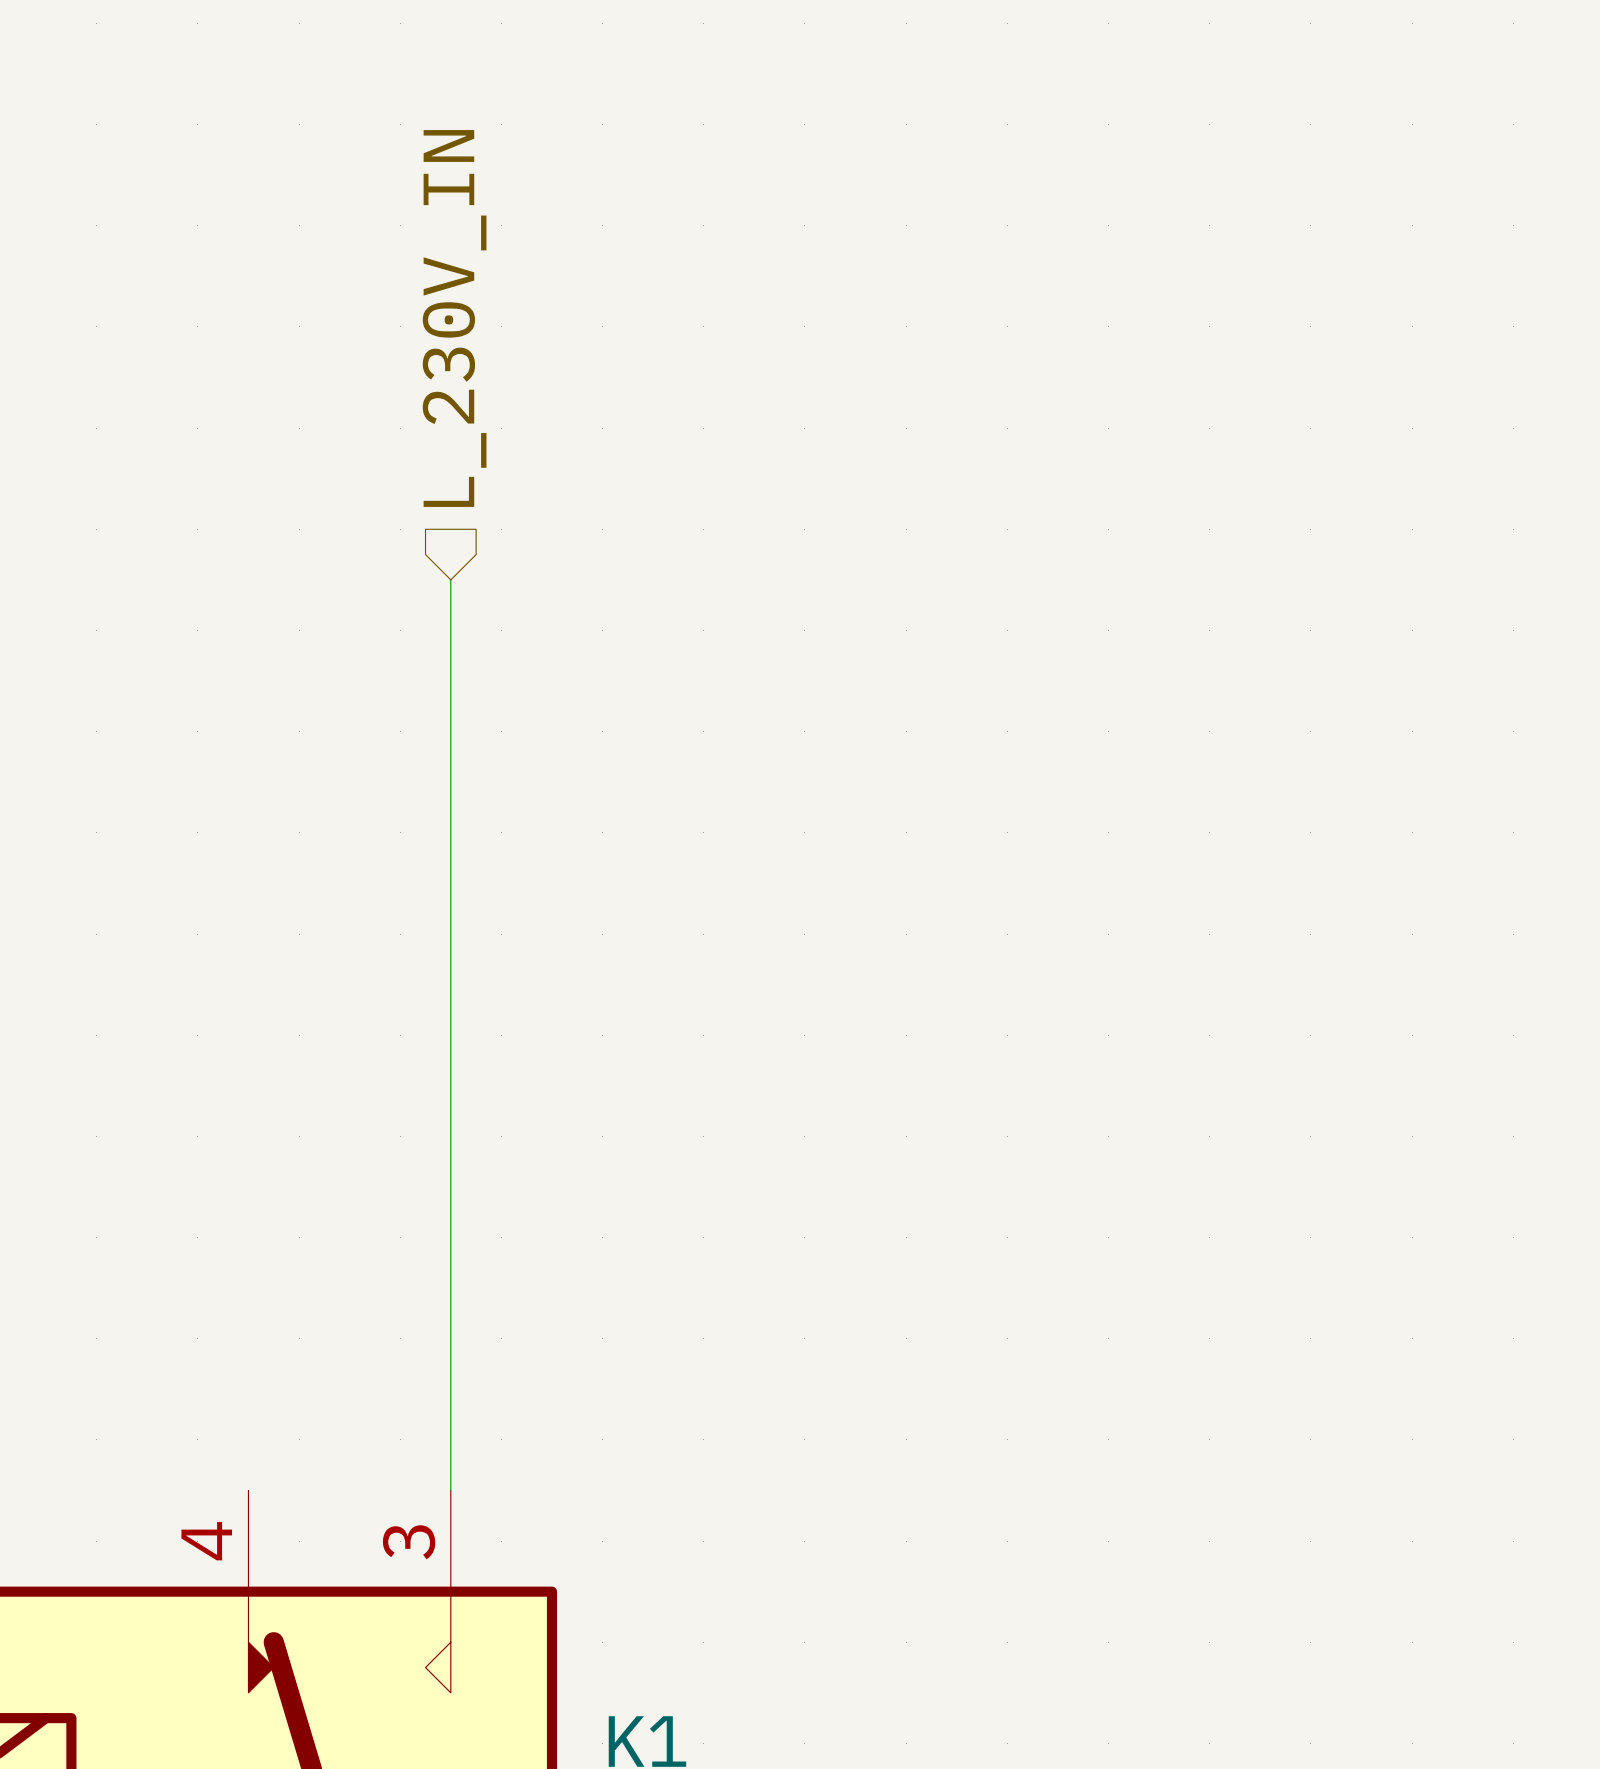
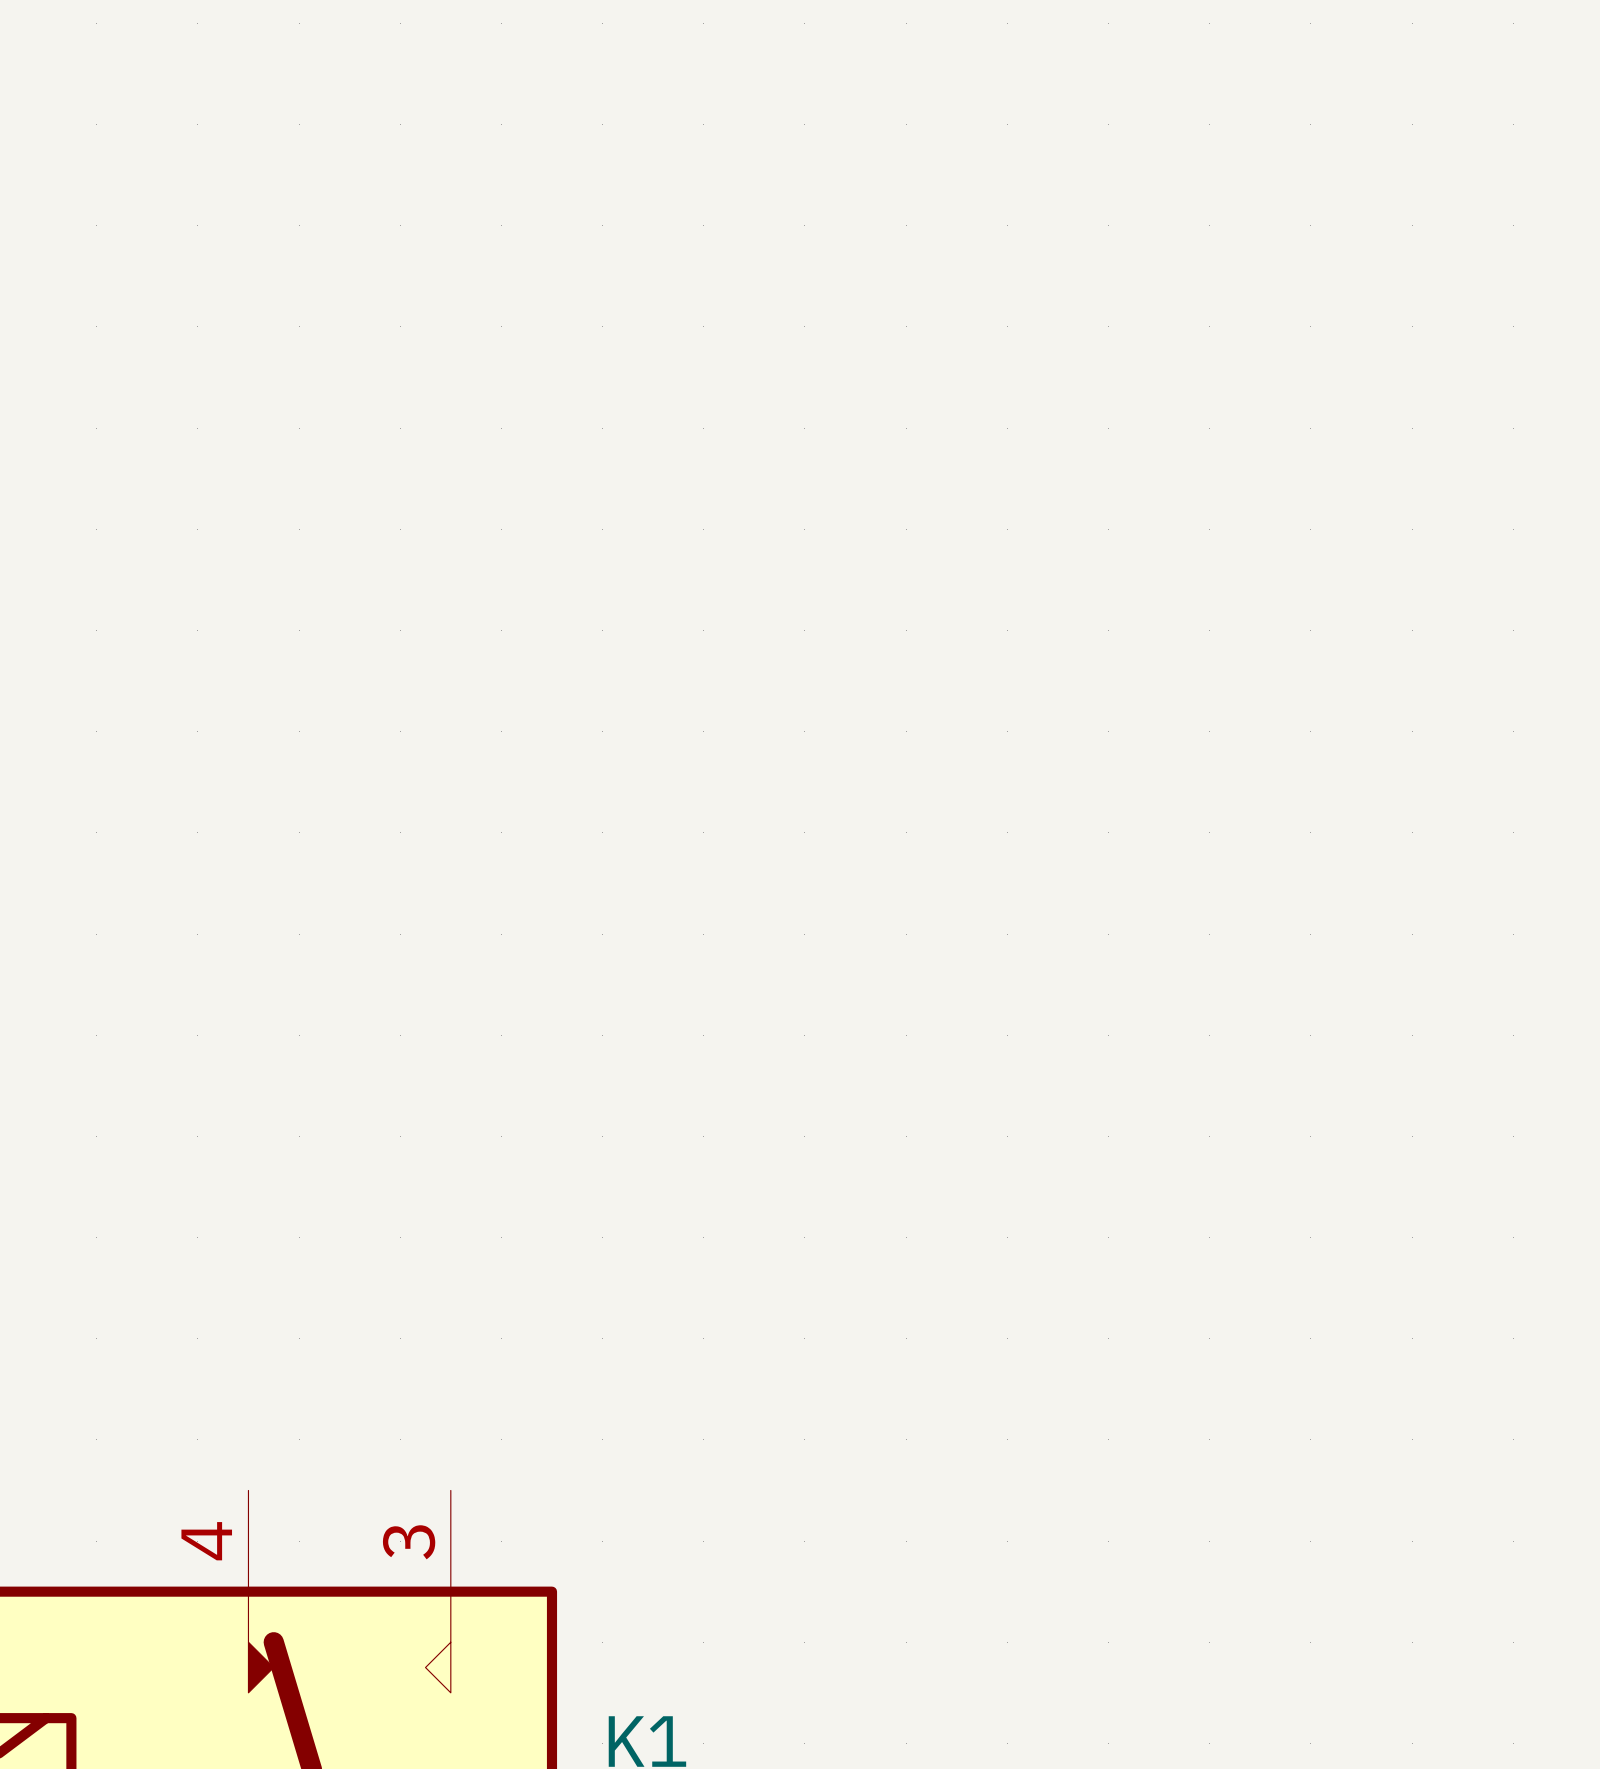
hierarchical label: L_230V_IN (454, 318) -> none
wire: (450, 579) (450, 1490) -> none

